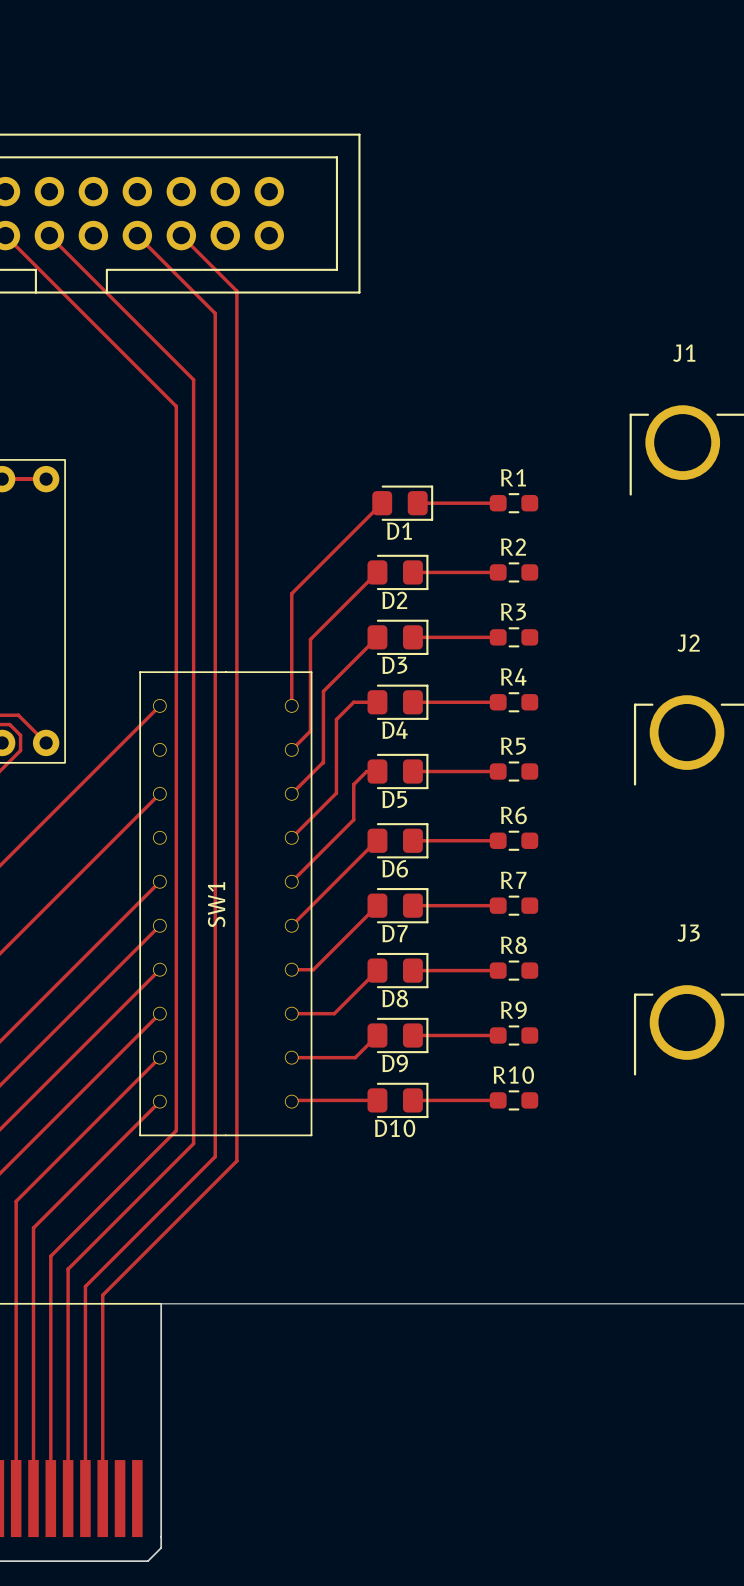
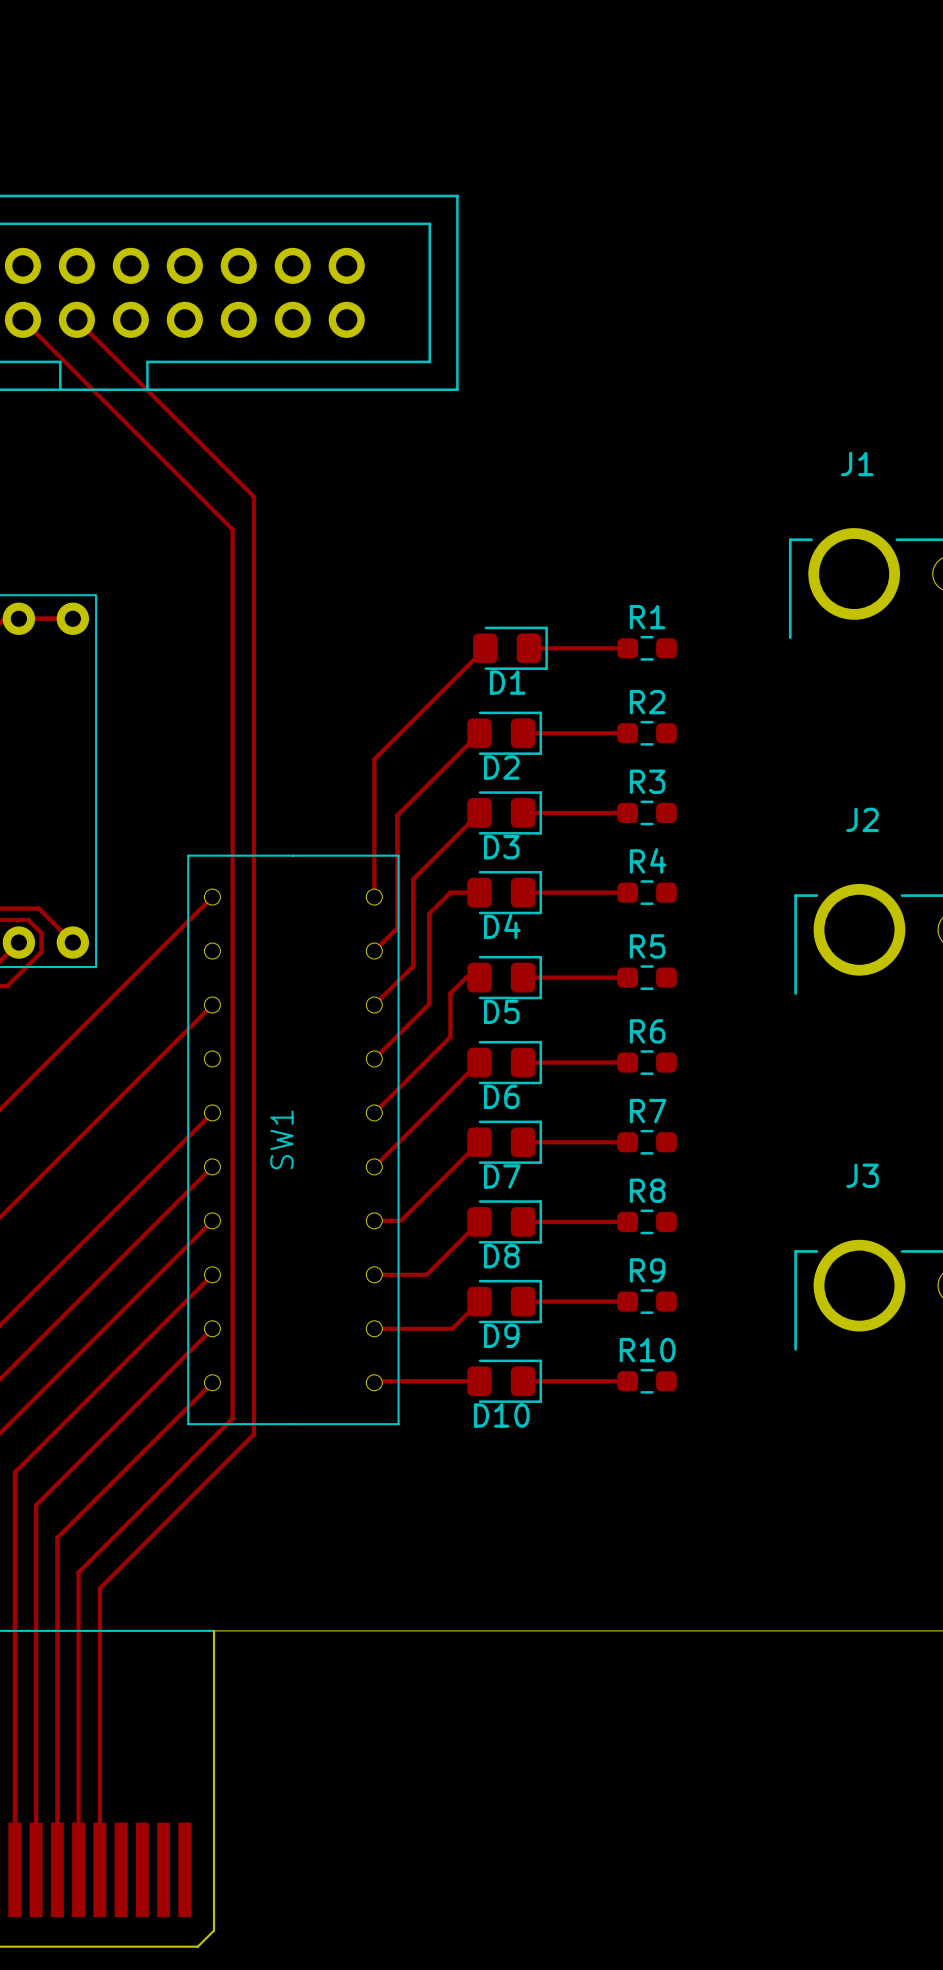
track: (137, 235) (215, 313) (215, 1156) (85, 1286) (85, 1498) -> none
track: (181, 235) (236, 291) (236, 1161) (102, 1295) (102, 1498) -> none

